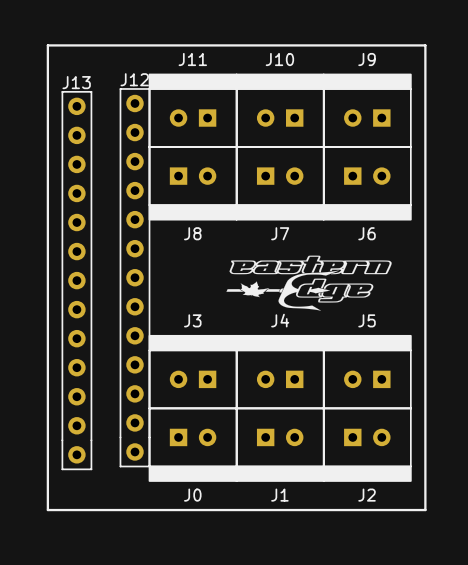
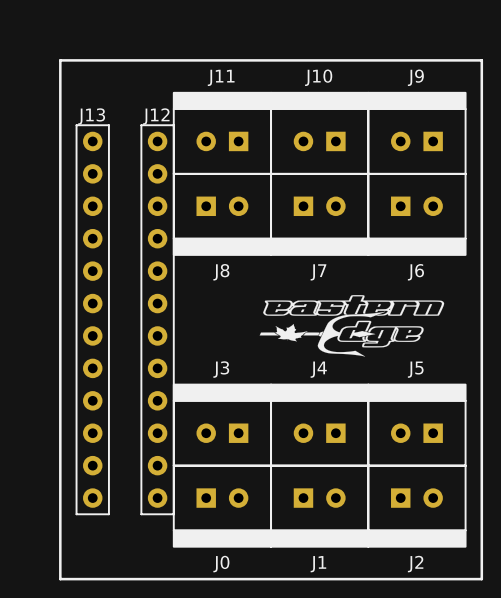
J12 footprint: [119, 88, 151, 468] -> [140, 124, 175, 516]
J13 footprint: [61, 90, 93, 471] -> [75, 124, 110, 516]

